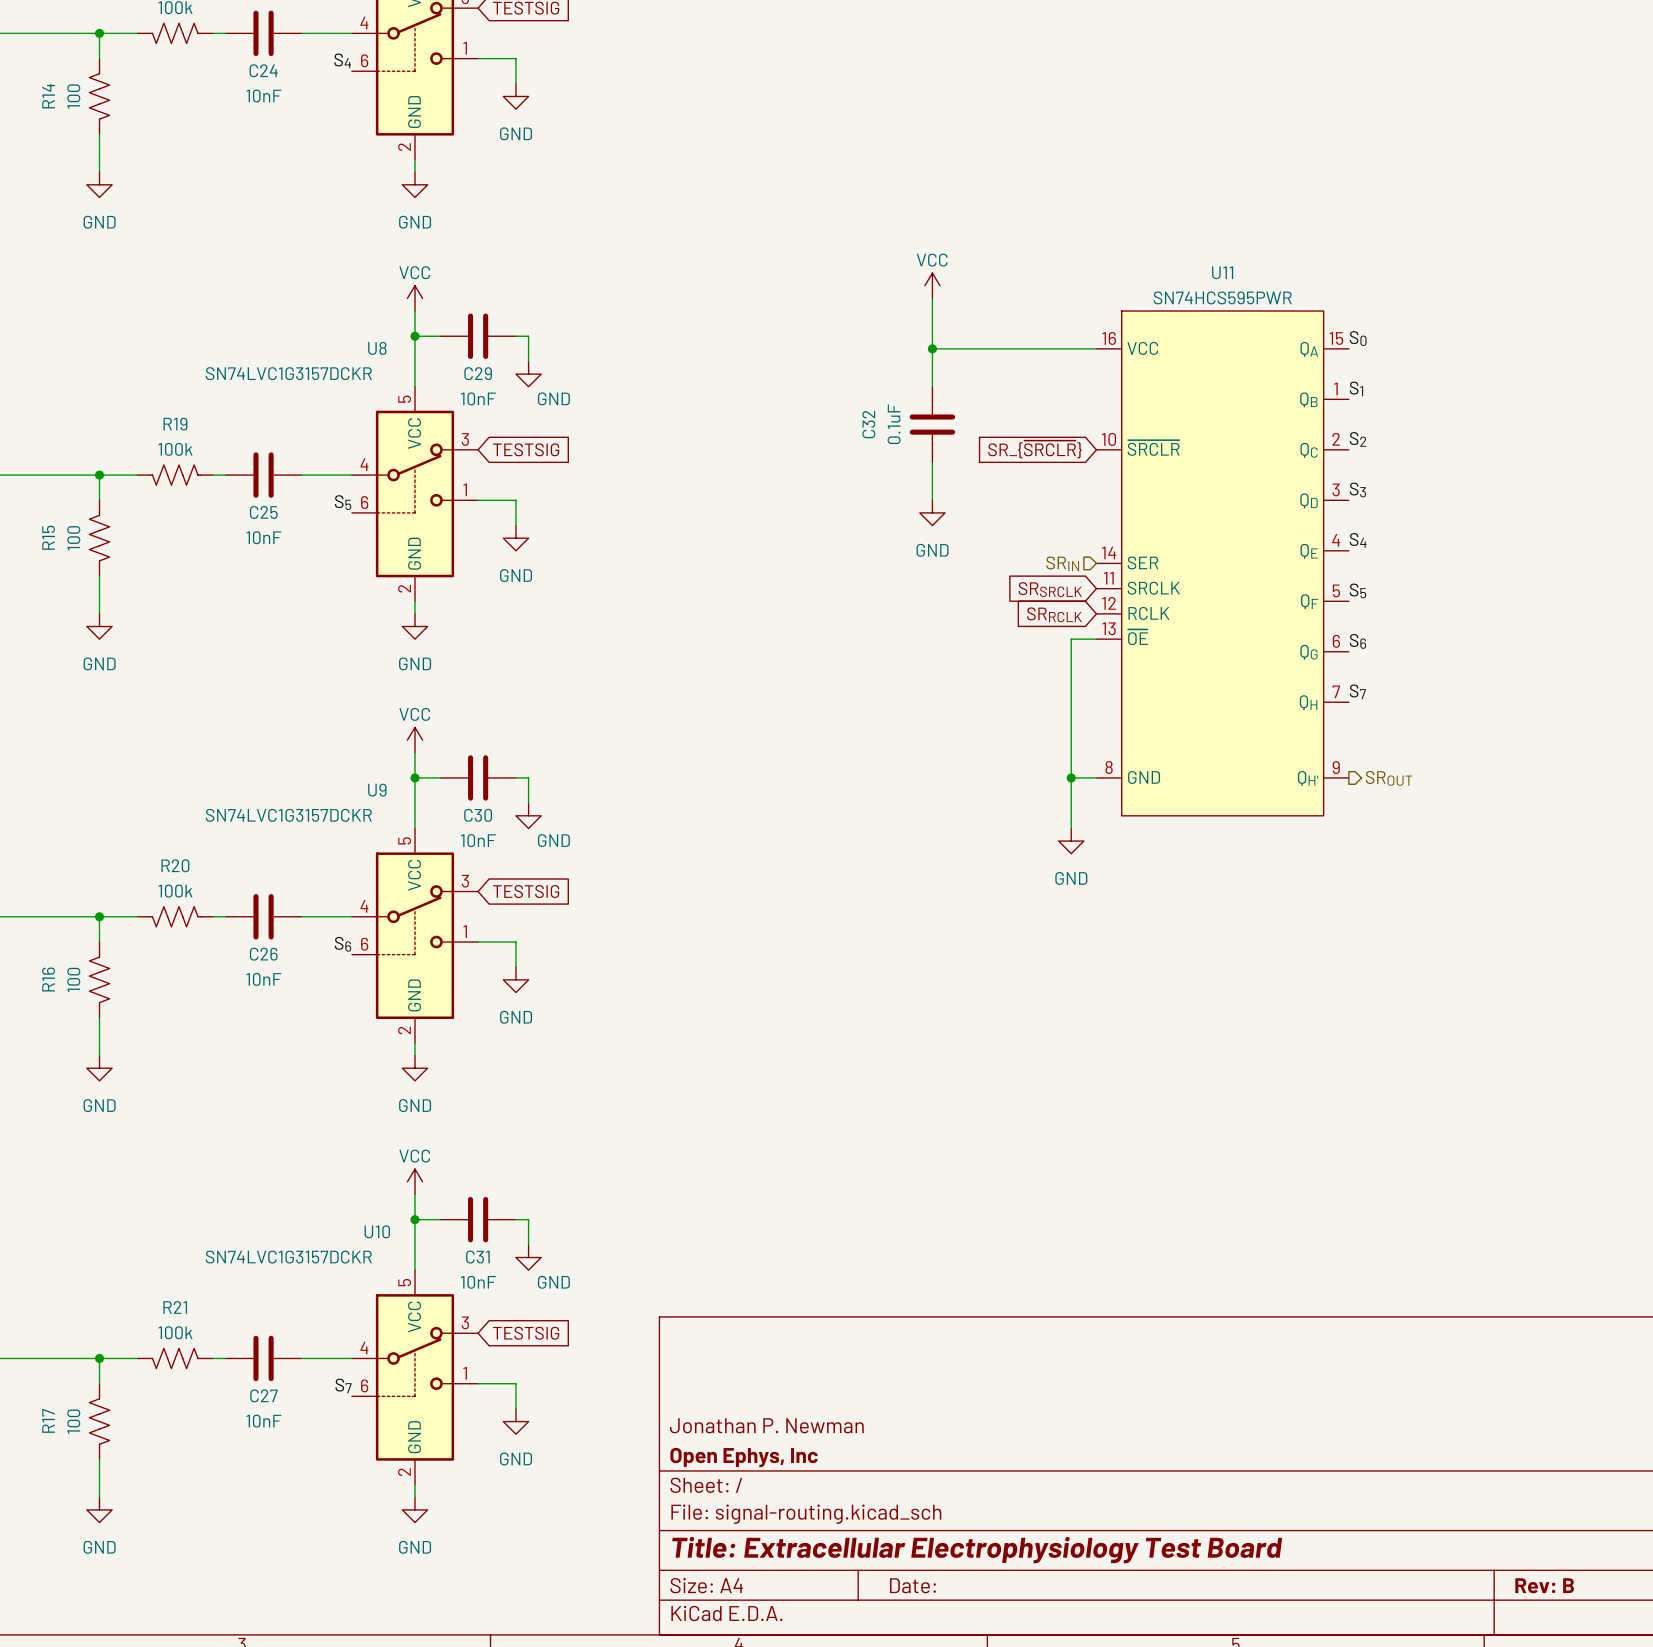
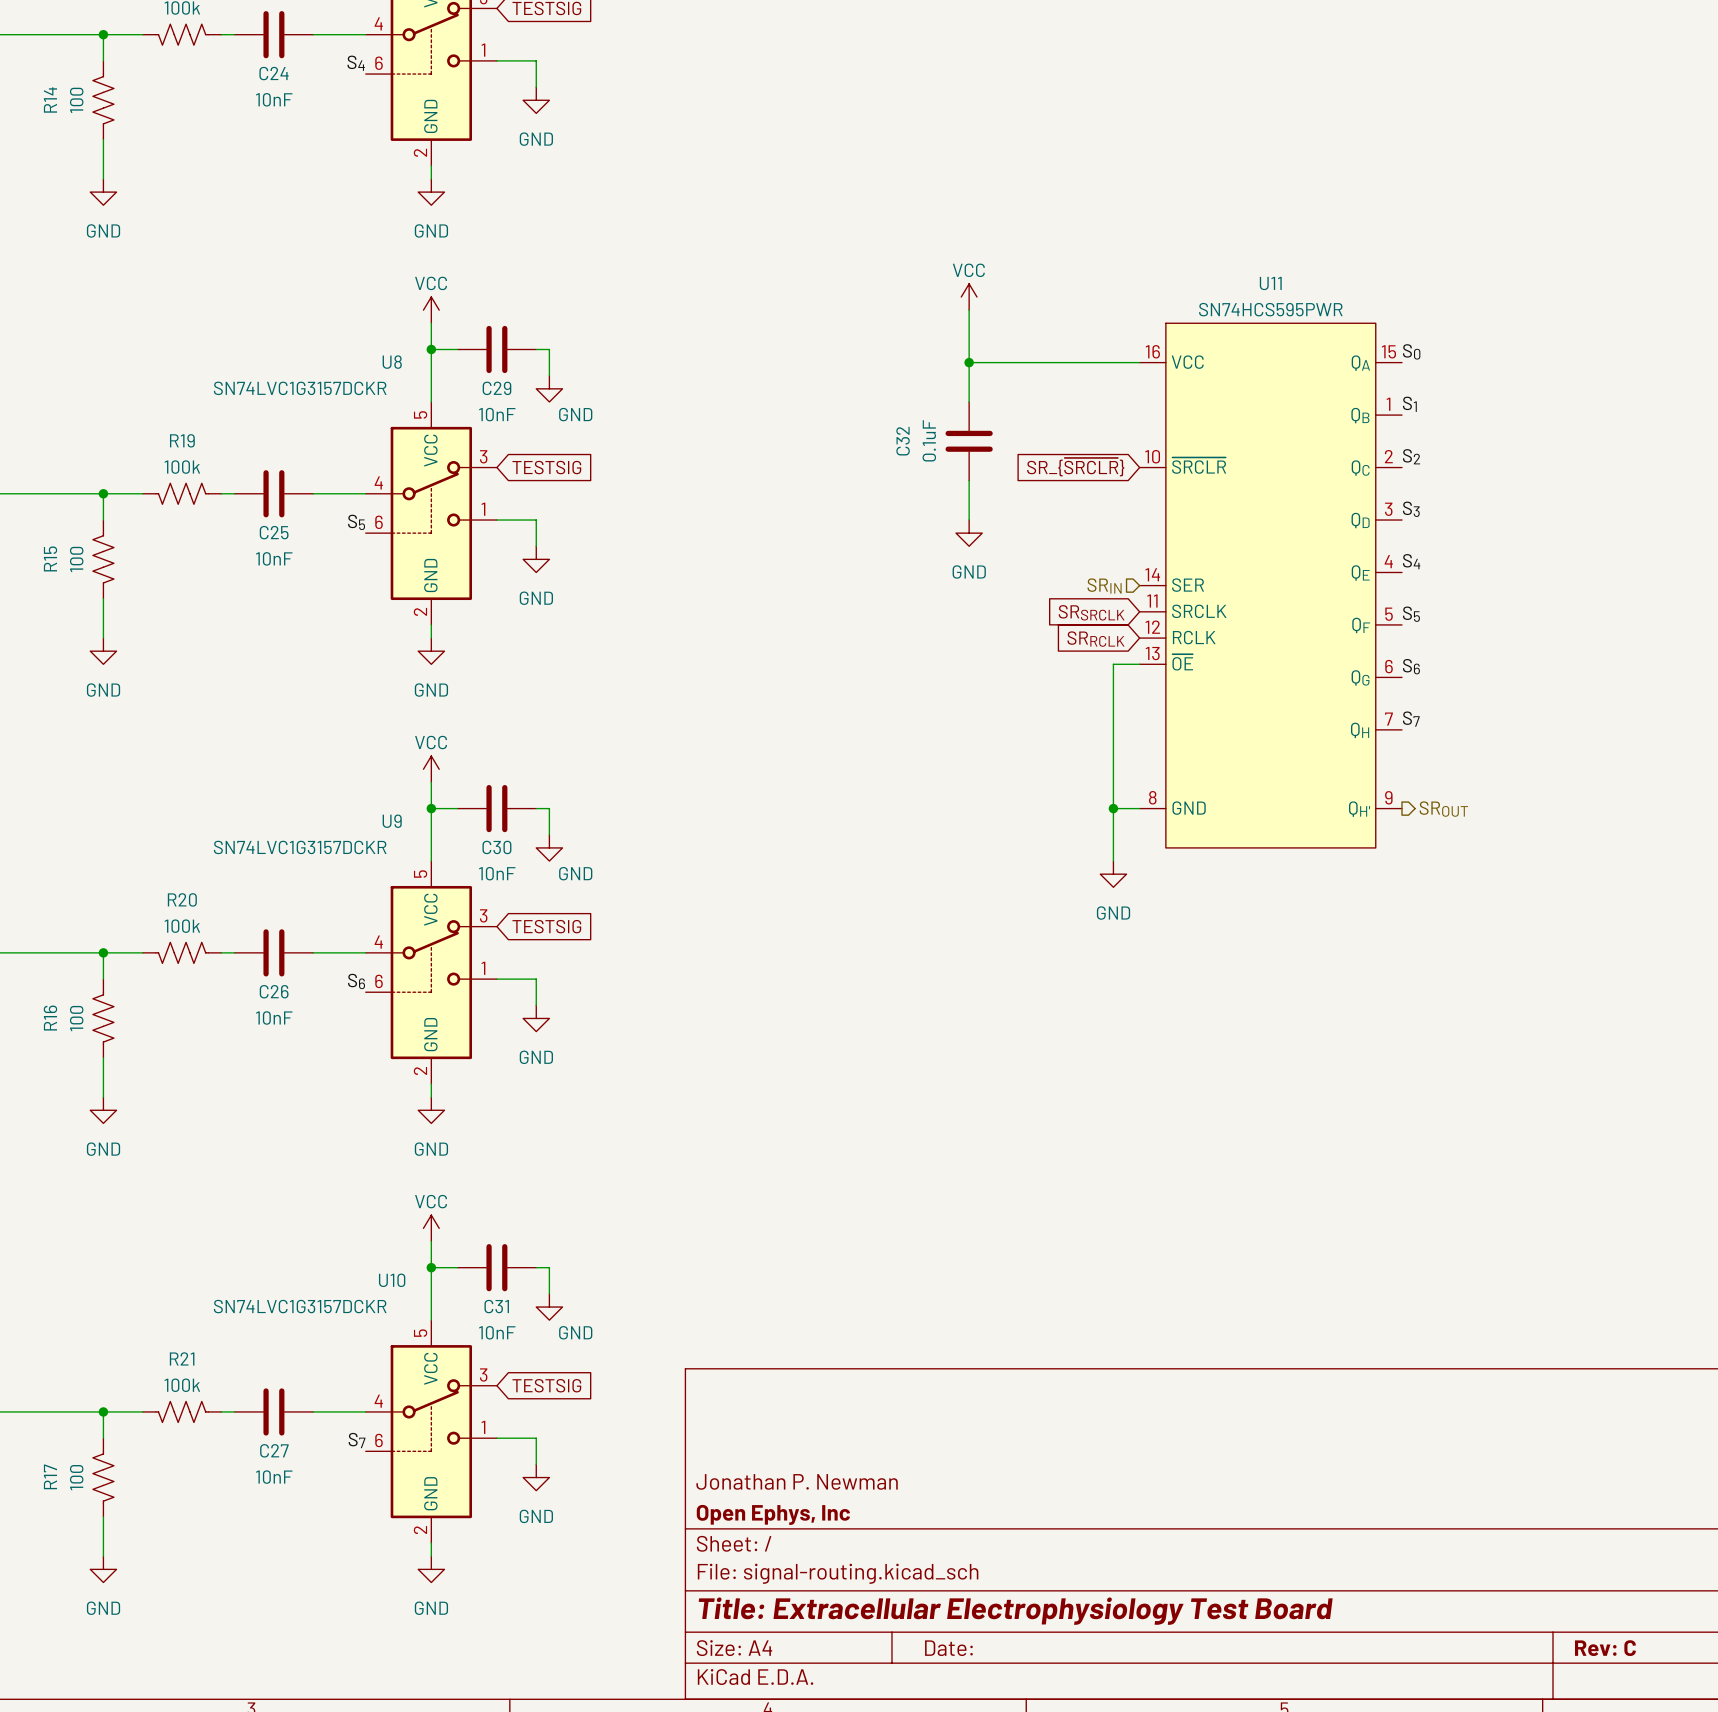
title block: Rev: B (1544, 1585) -> Rev: C (1605, 1648)

